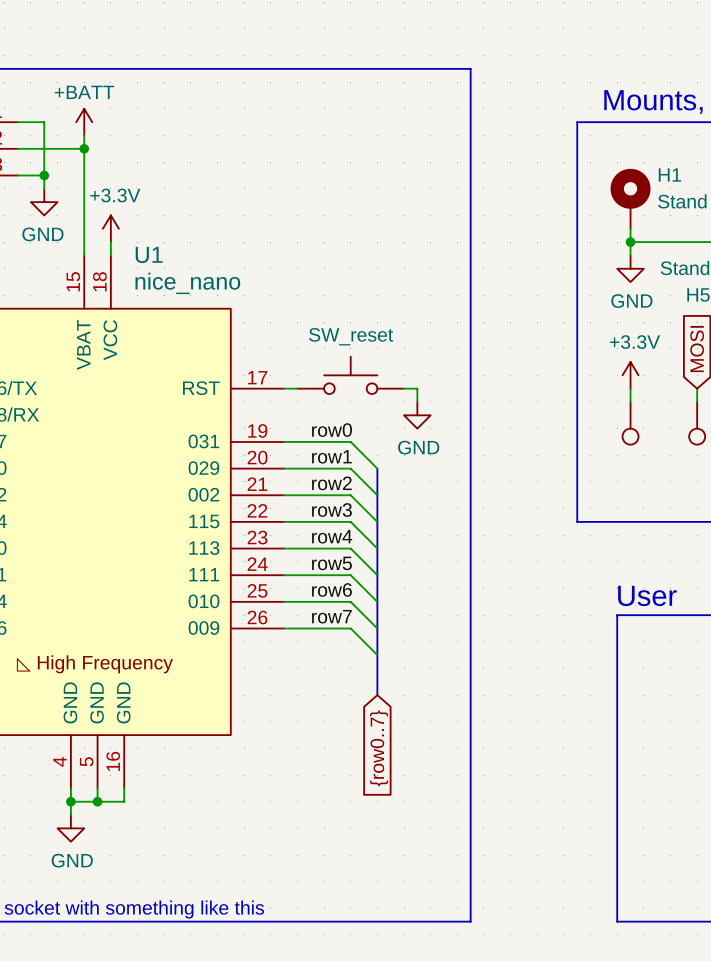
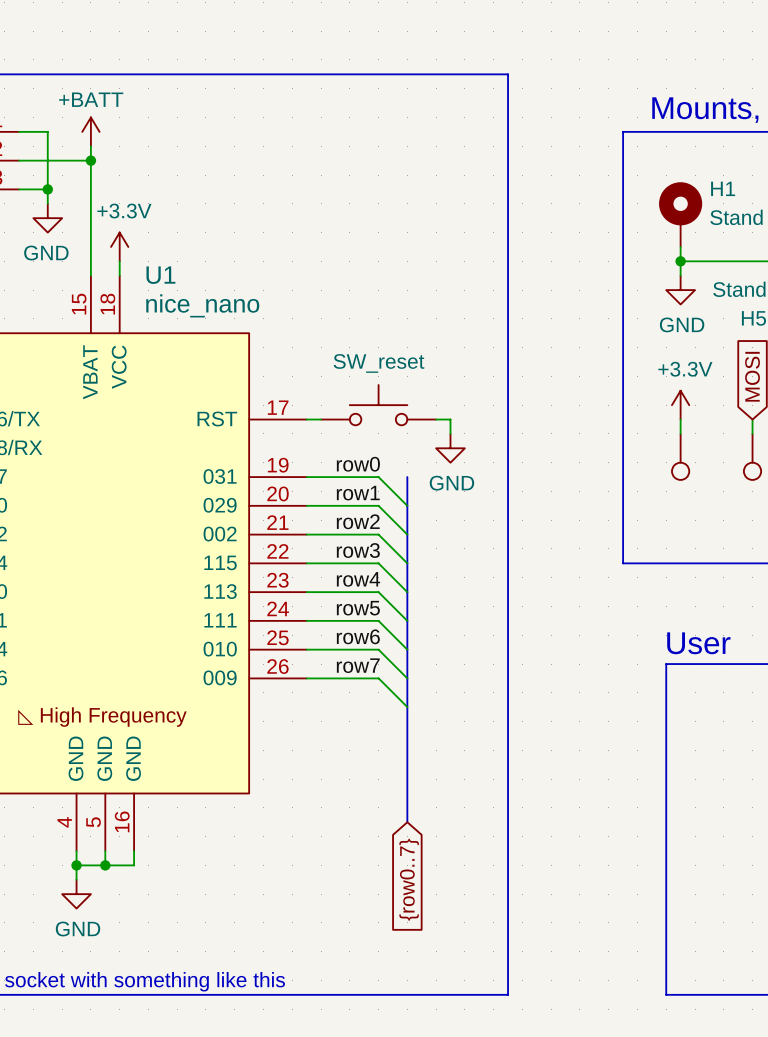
bus: none -> (407, 477) (407, 505)
bus: none -> (407, 750) (407, 822)
global label position: {row0..7} (379, 748) -> {row0..7} (409, 879)

